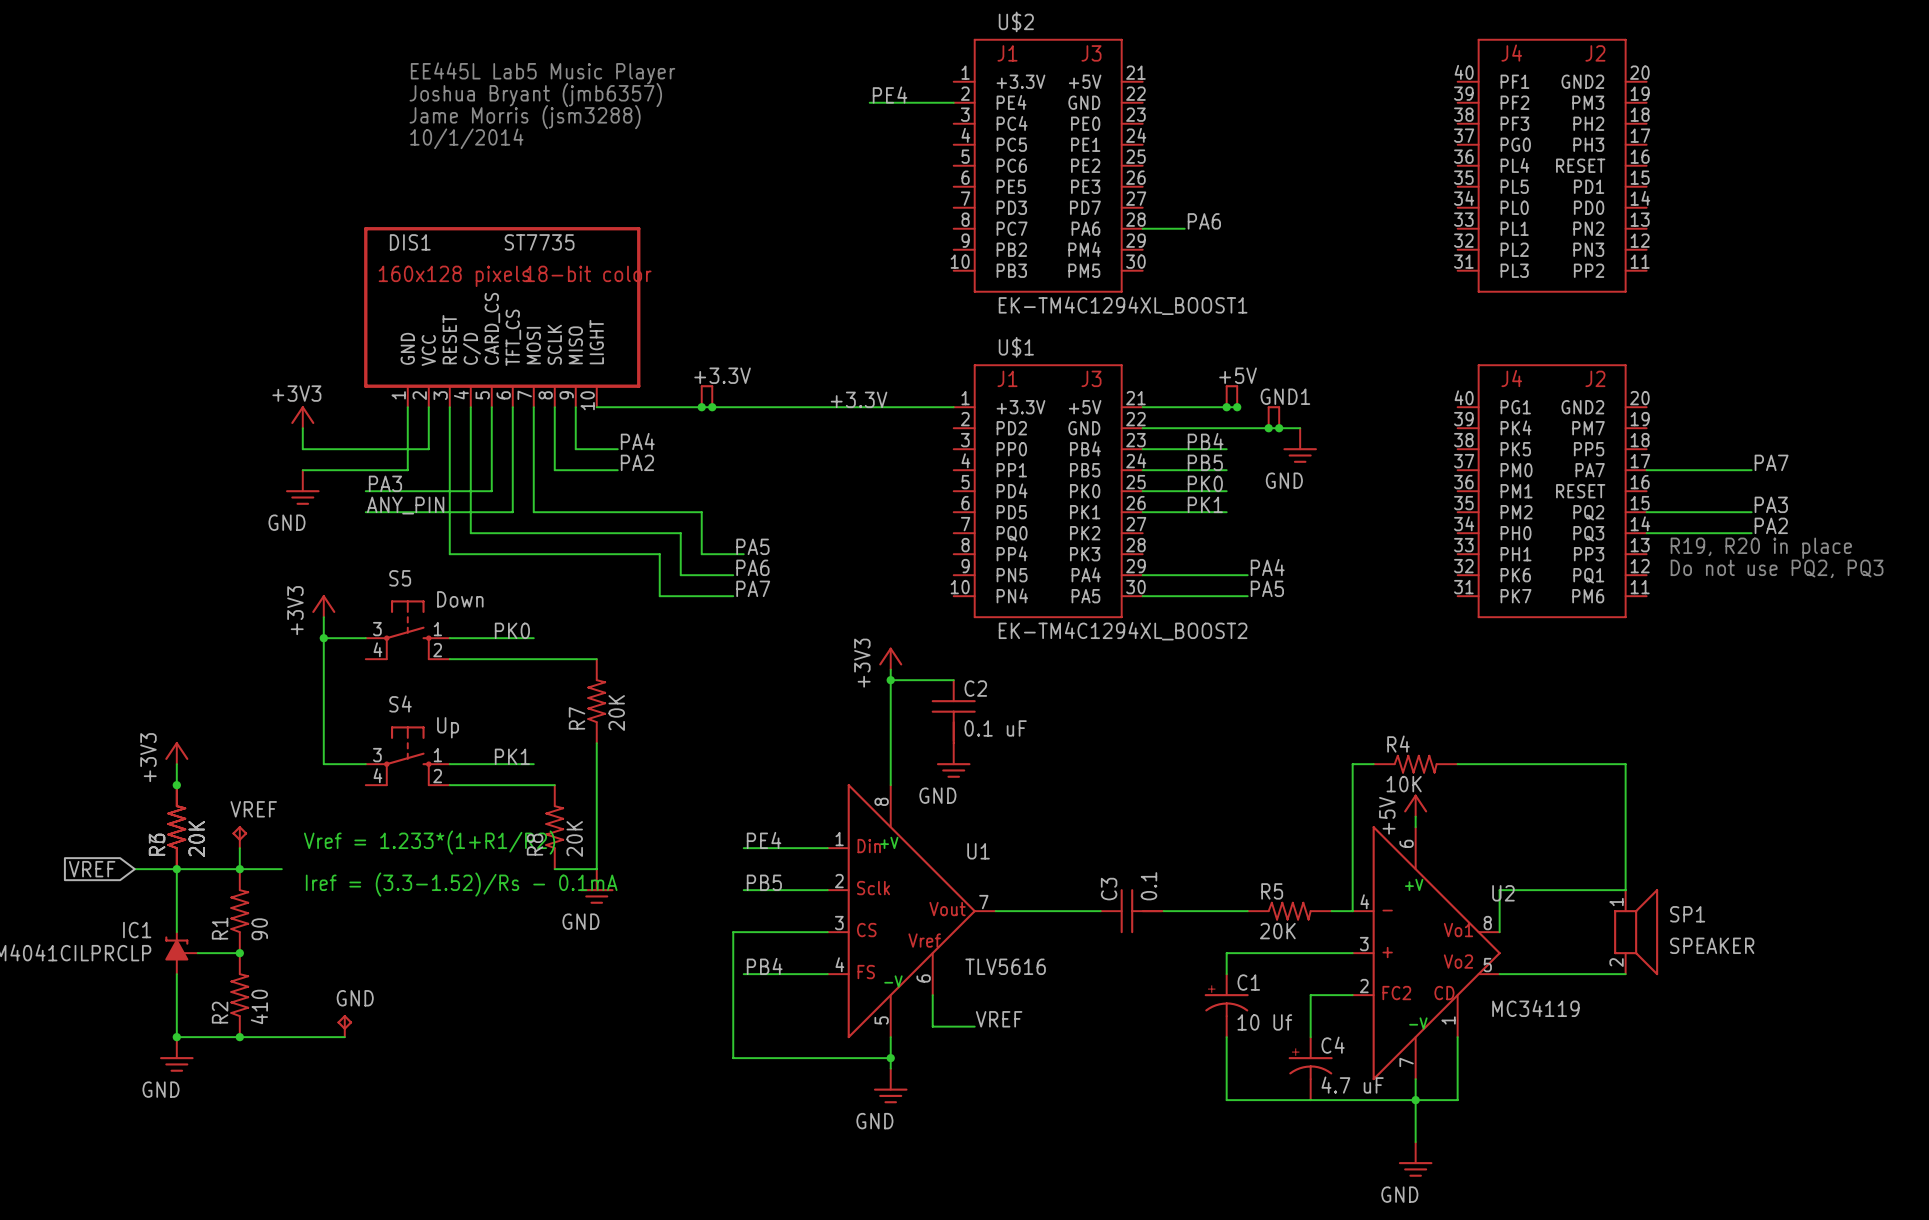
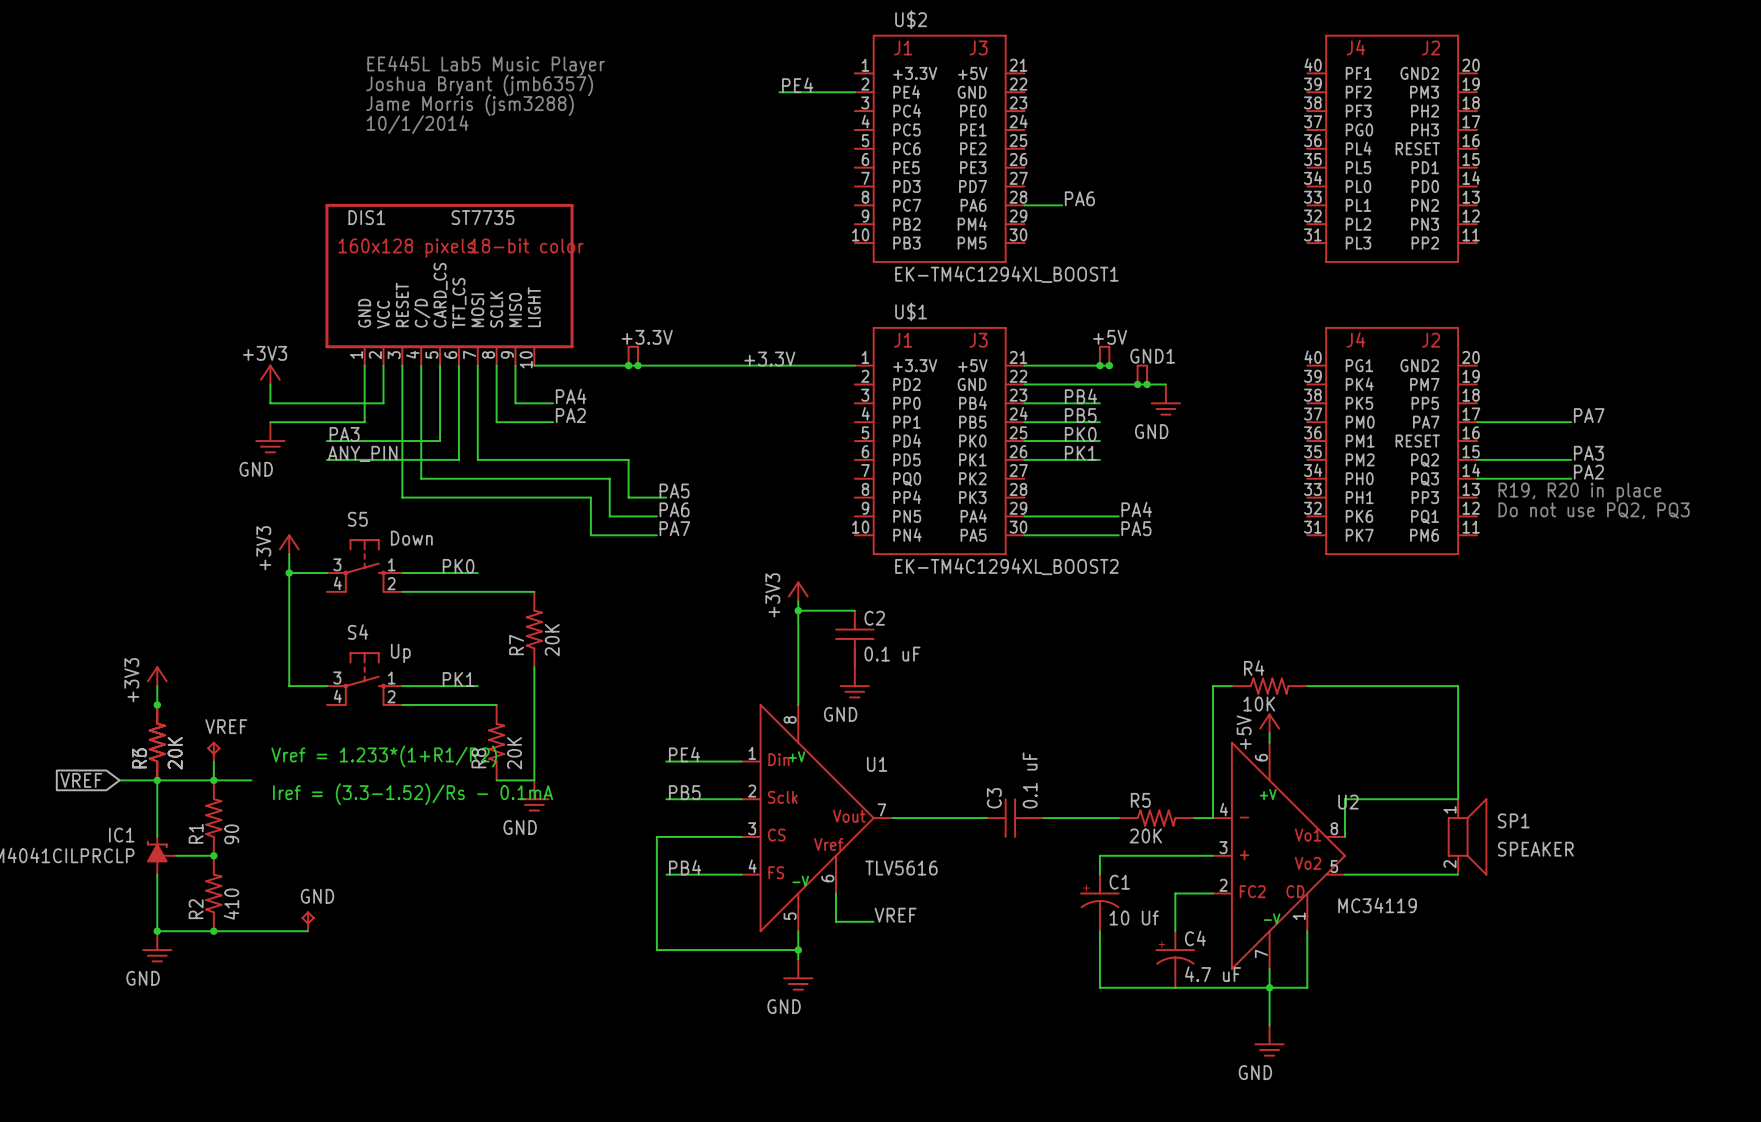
C3 value: 0.1 (1148, 886) -> 0.1 uF (1030, 780)

